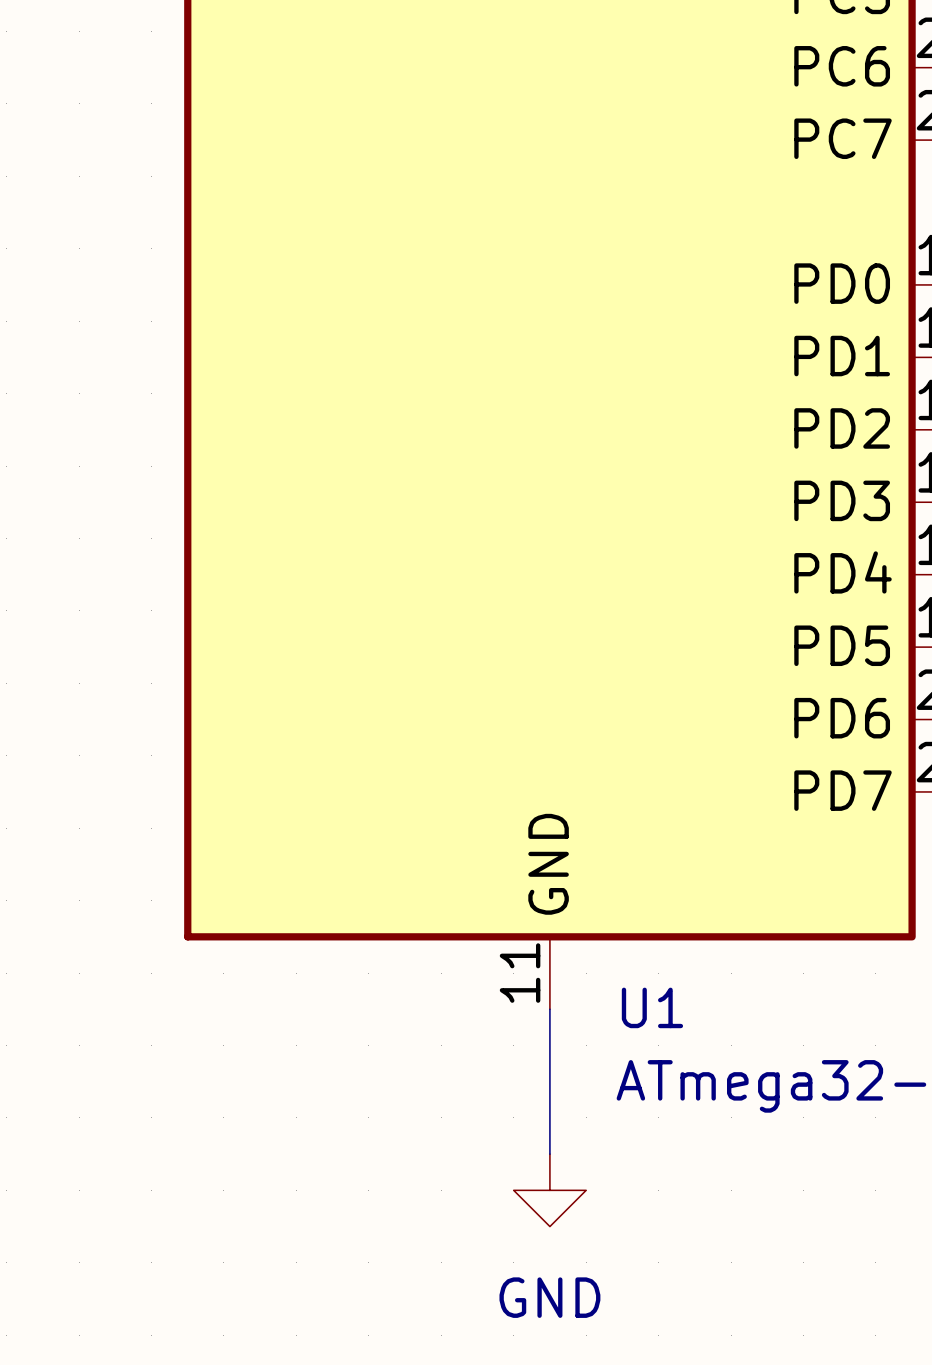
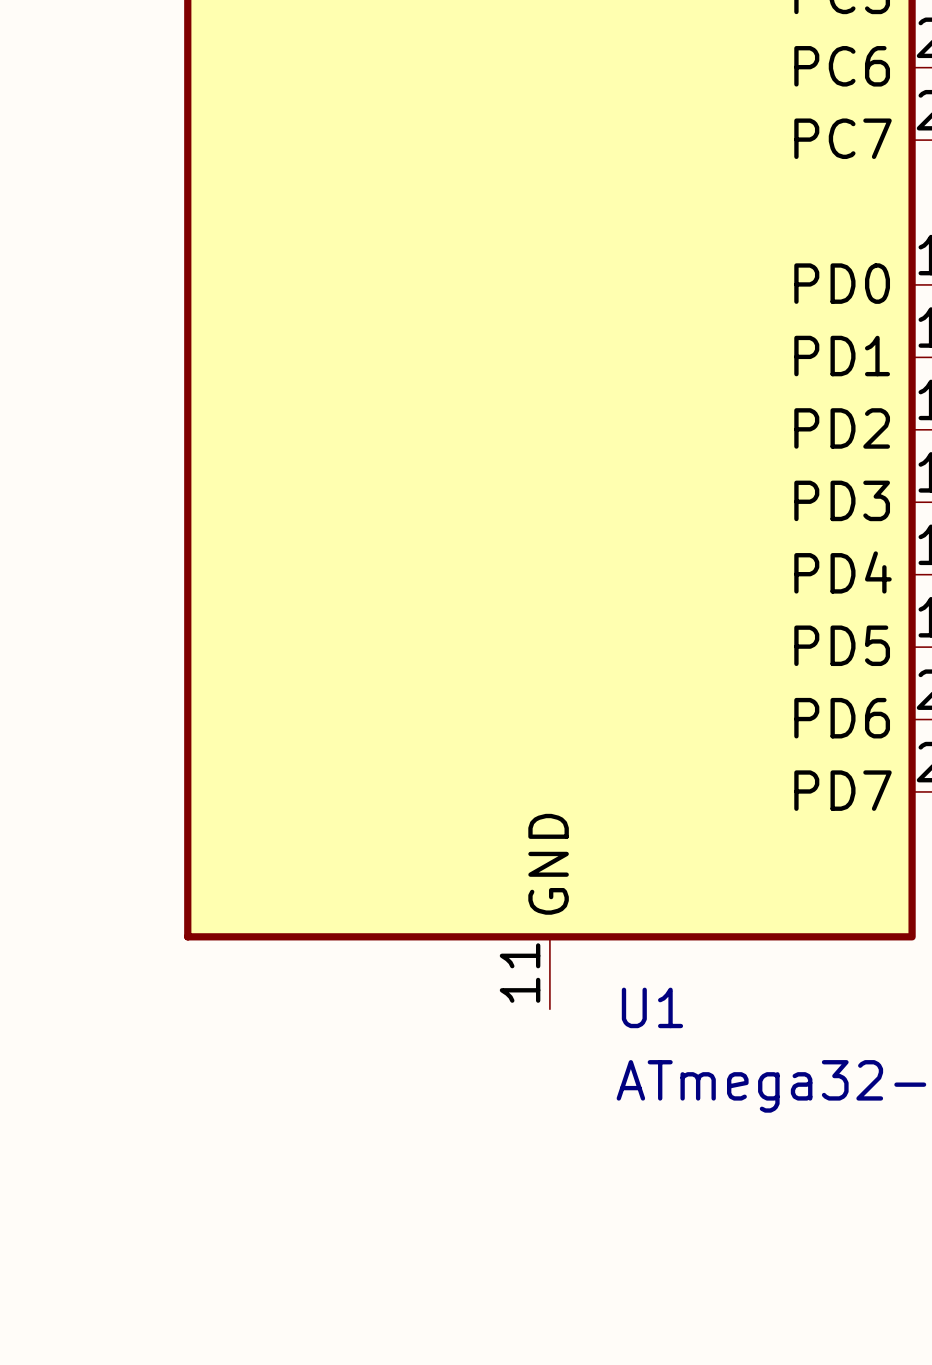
wire: (549, 1009) (549, 1154) -> none
power symbol: GND (549, 1190) -> none

